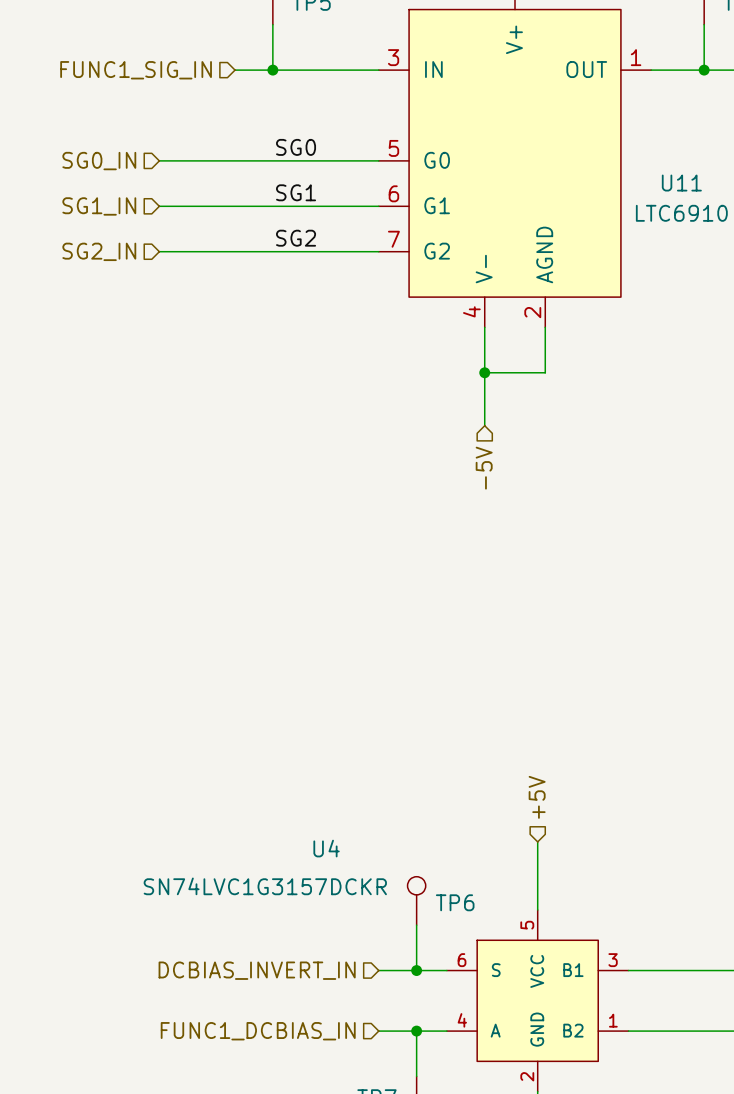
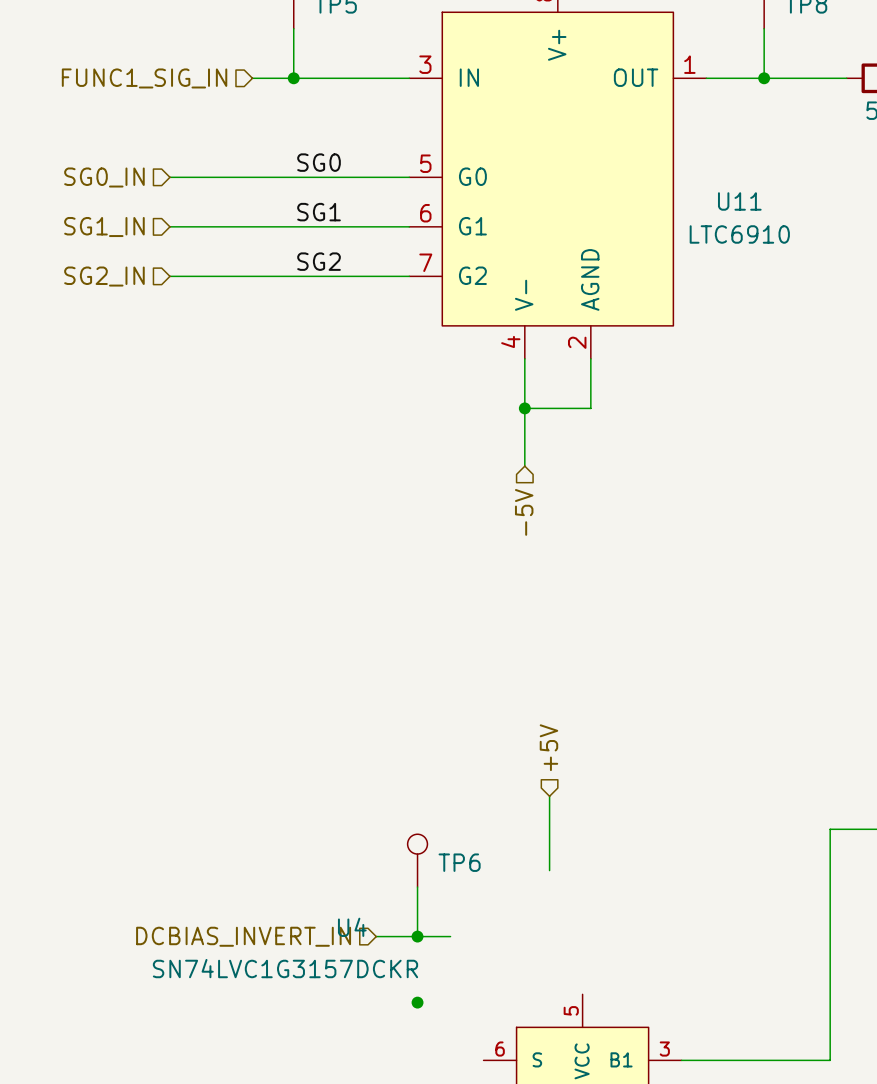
hierarchical label position: +5V (537, 797) -> +5V (548, 747)
wire: (537, 841) (537, 910) -> (549, 796) (549, 870)
junction: none -> (417, 936)
TP6 position: (416, 900) -> (417, 860)
junction: none -> (417, 1002)
wire: (416, 925) (416, 970) -> (417, 887) (417, 936)
hierarchical label position: DCBIAS_INVERT_IN (257, 970) -> DCBIAS_INVERT_IN (243, 936)
wire: (378, 970) (446, 970) -> (376, 936) (450, 936)
junction: (416, 970) -> none

